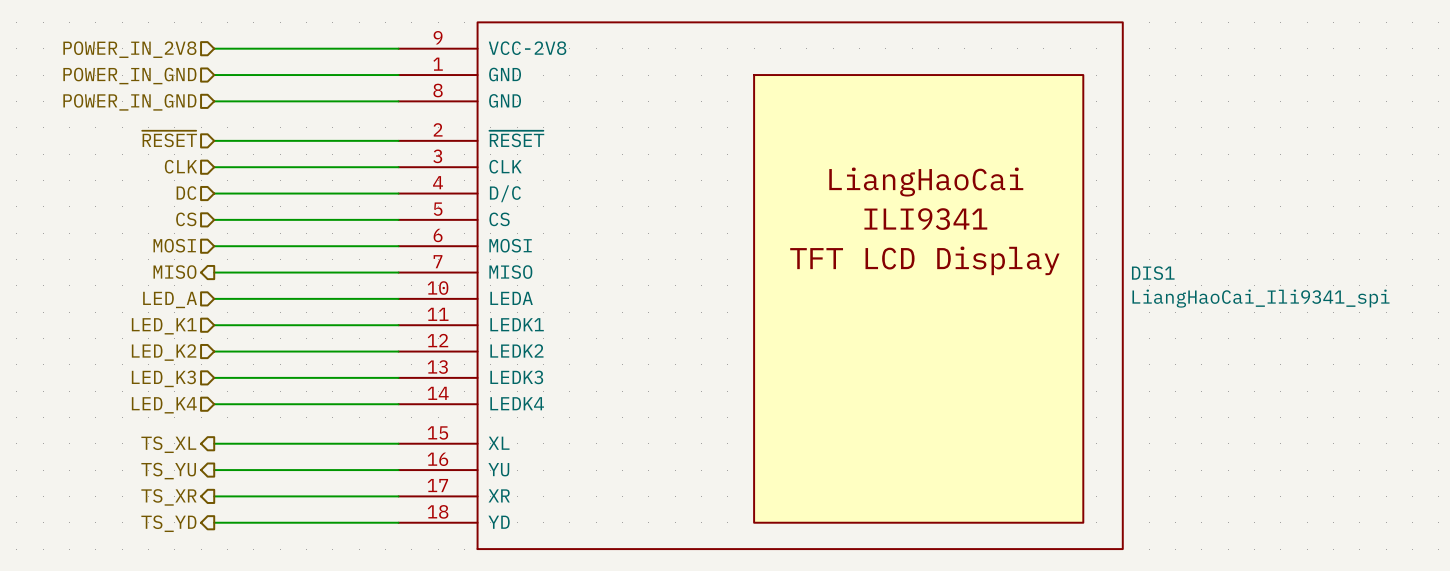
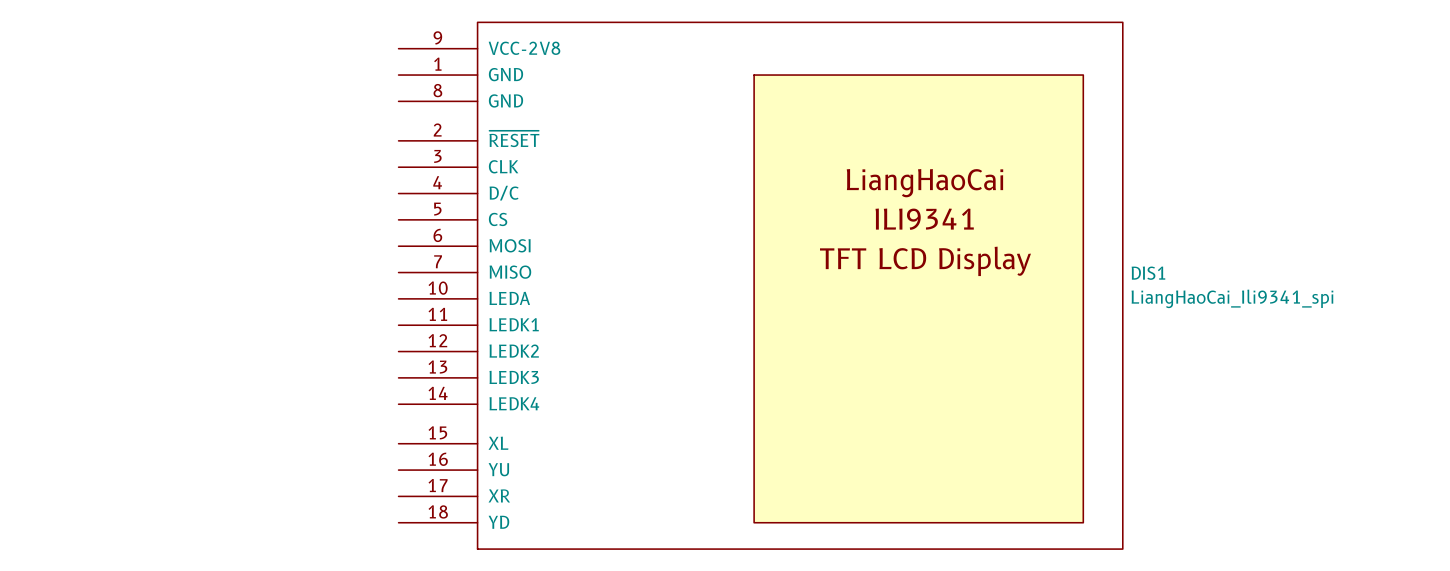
wire: (214, 48) (398, 48) -> none
hierarchical label: POWER_IN_2V8 (129, 49) -> none
wire: (214, 75) (398, 75) -> none
hierarchical label: POWER_IN_GND (129, 76) -> none
wire: (214, 101) (398, 101) -> none
hierarchical label: POWER_IN_GND (129, 102) -> none
hierarchical label: ~{RESET} (169, 138) -> none
wire: (214, 140) (398, 140) -> none
hierarchical label: CLK (180, 166) -> none
wire: (214, 167) (398, 167) -> none
hierarchical label: DC (186, 193) -> none
wire: (214, 193) (398, 193) -> none
hierarchical label: CS (186, 219) -> none
wire: (214, 219) (398, 219) -> none
hierarchical label: MOSI (174, 245) -> none
wire: (214, 246) (398, 246) -> none
hierarchical label: MISO (174, 272) -> none
wire: (214, 272) (398, 272) -> none
wire: (214, 298) (398, 298) -> none
hierarchical label: LED_A (170, 299) -> none
wire: (214, 325) (398, 325) -> none
hierarchical label: LED_K1 (164, 326) -> none
wire: (214, 351) (398, 351) -> none
hierarchical label: LED_K2 (164, 352) -> none
wire: (214, 377) (398, 377) -> none
hierarchical label: LED_K3 (163, 378) -> none
wire: (214, 404) (398, 404) -> none
hierarchical label: LED_K4 (164, 405) -> none
wire: (214, 443) (398, 443) -> none
hierarchical label: TS_XL (168, 444) -> none
wire: (214, 470) (398, 470) -> none
hierarchical label: TS_YU (168, 471) -> none
wire: (214, 496) (398, 496) -> none
hierarchical label: TS_XR (168, 497) -> none
wire: (214, 522) (398, 522) -> none
hierarchical label: TS_YD (168, 523) -> none

